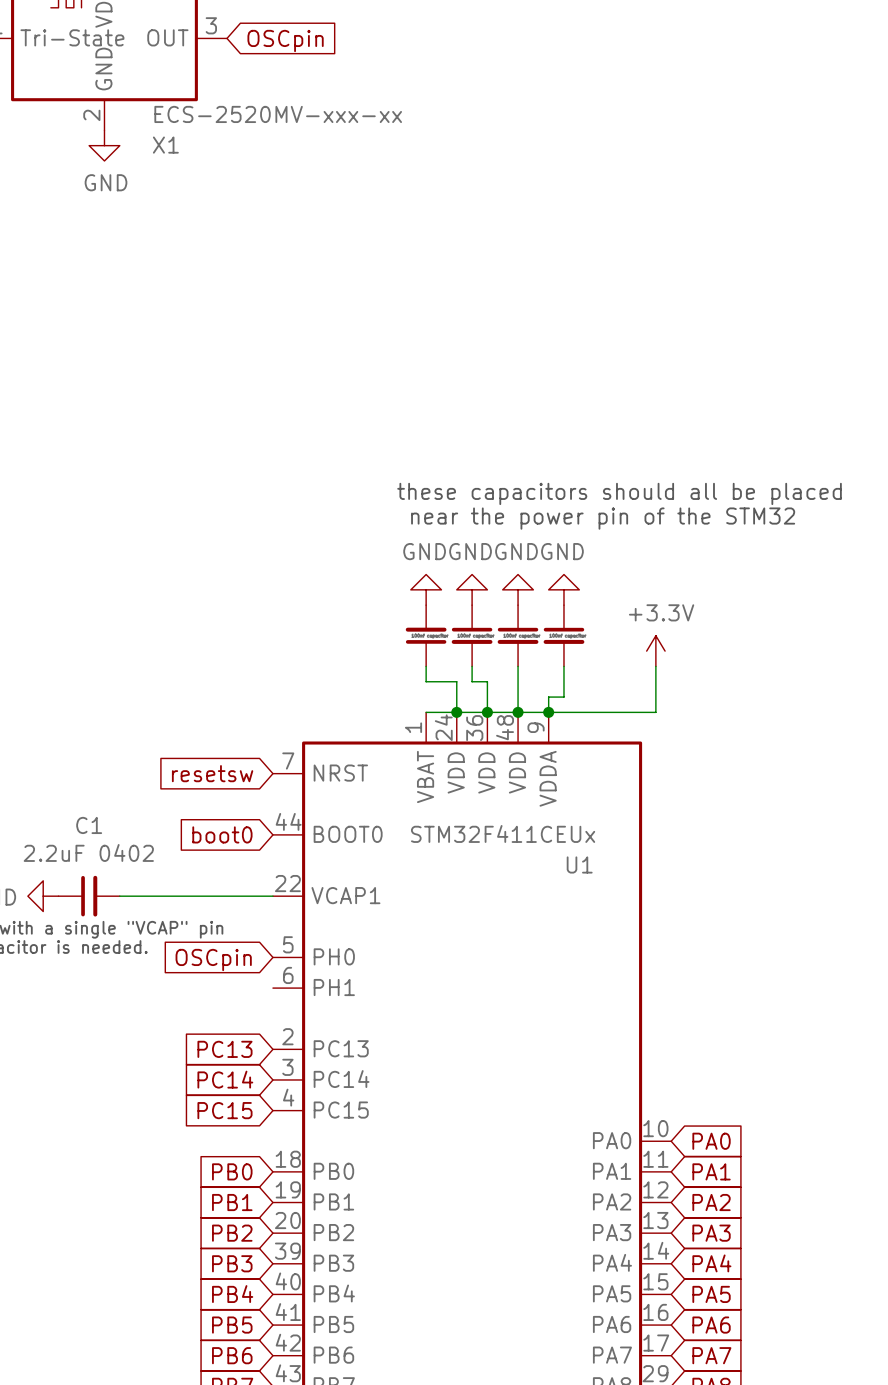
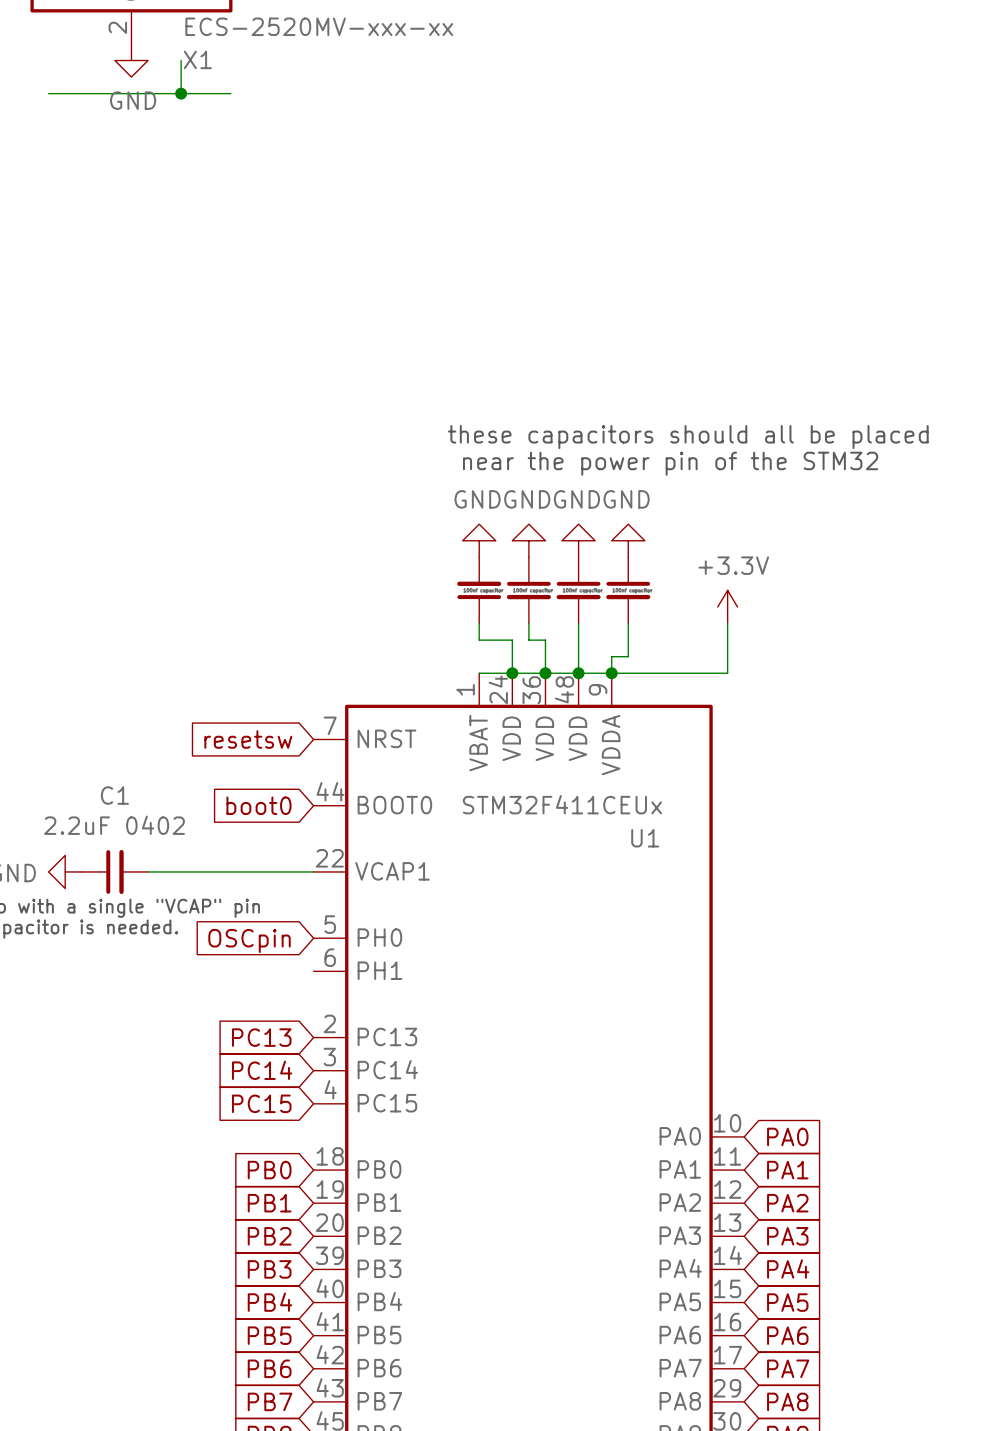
wire: none -> (181, 60) (181, 93)
wire: none -> (48, 93) (230, 93)
junction: none -> (181, 93)

